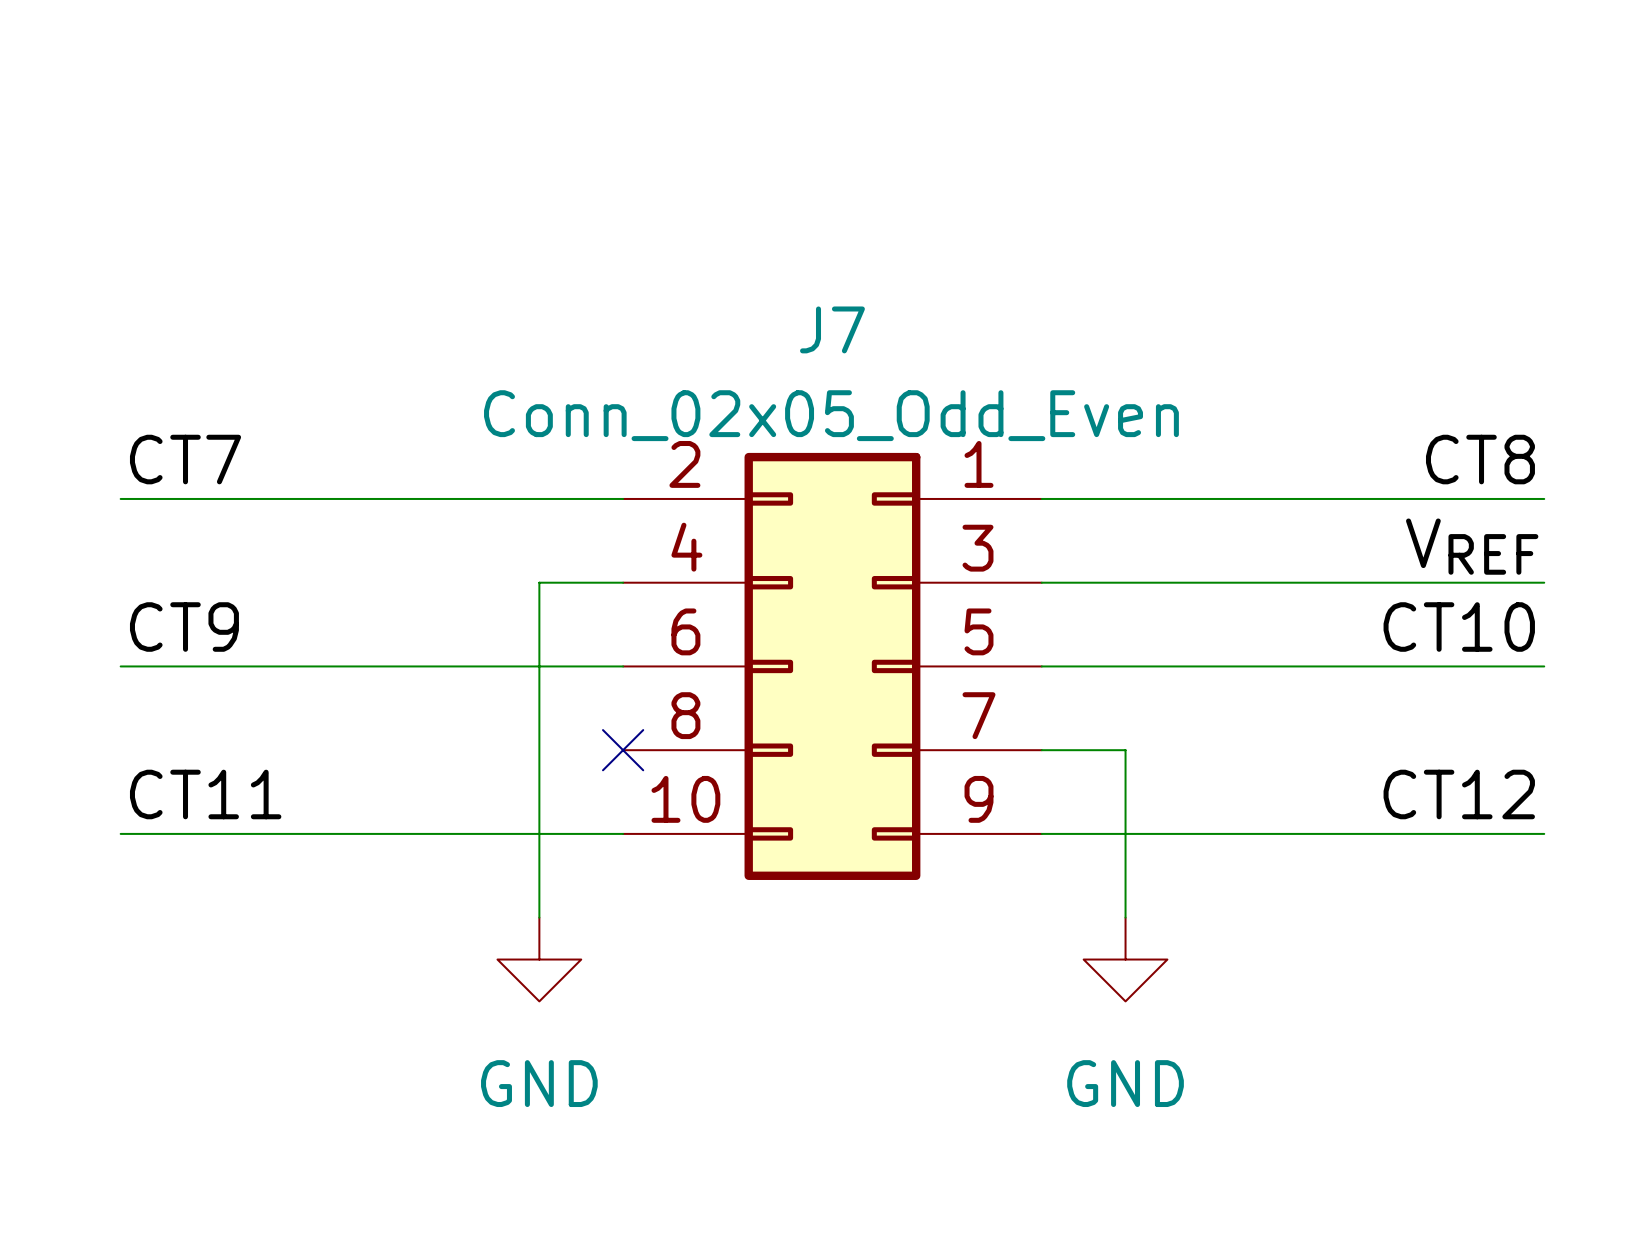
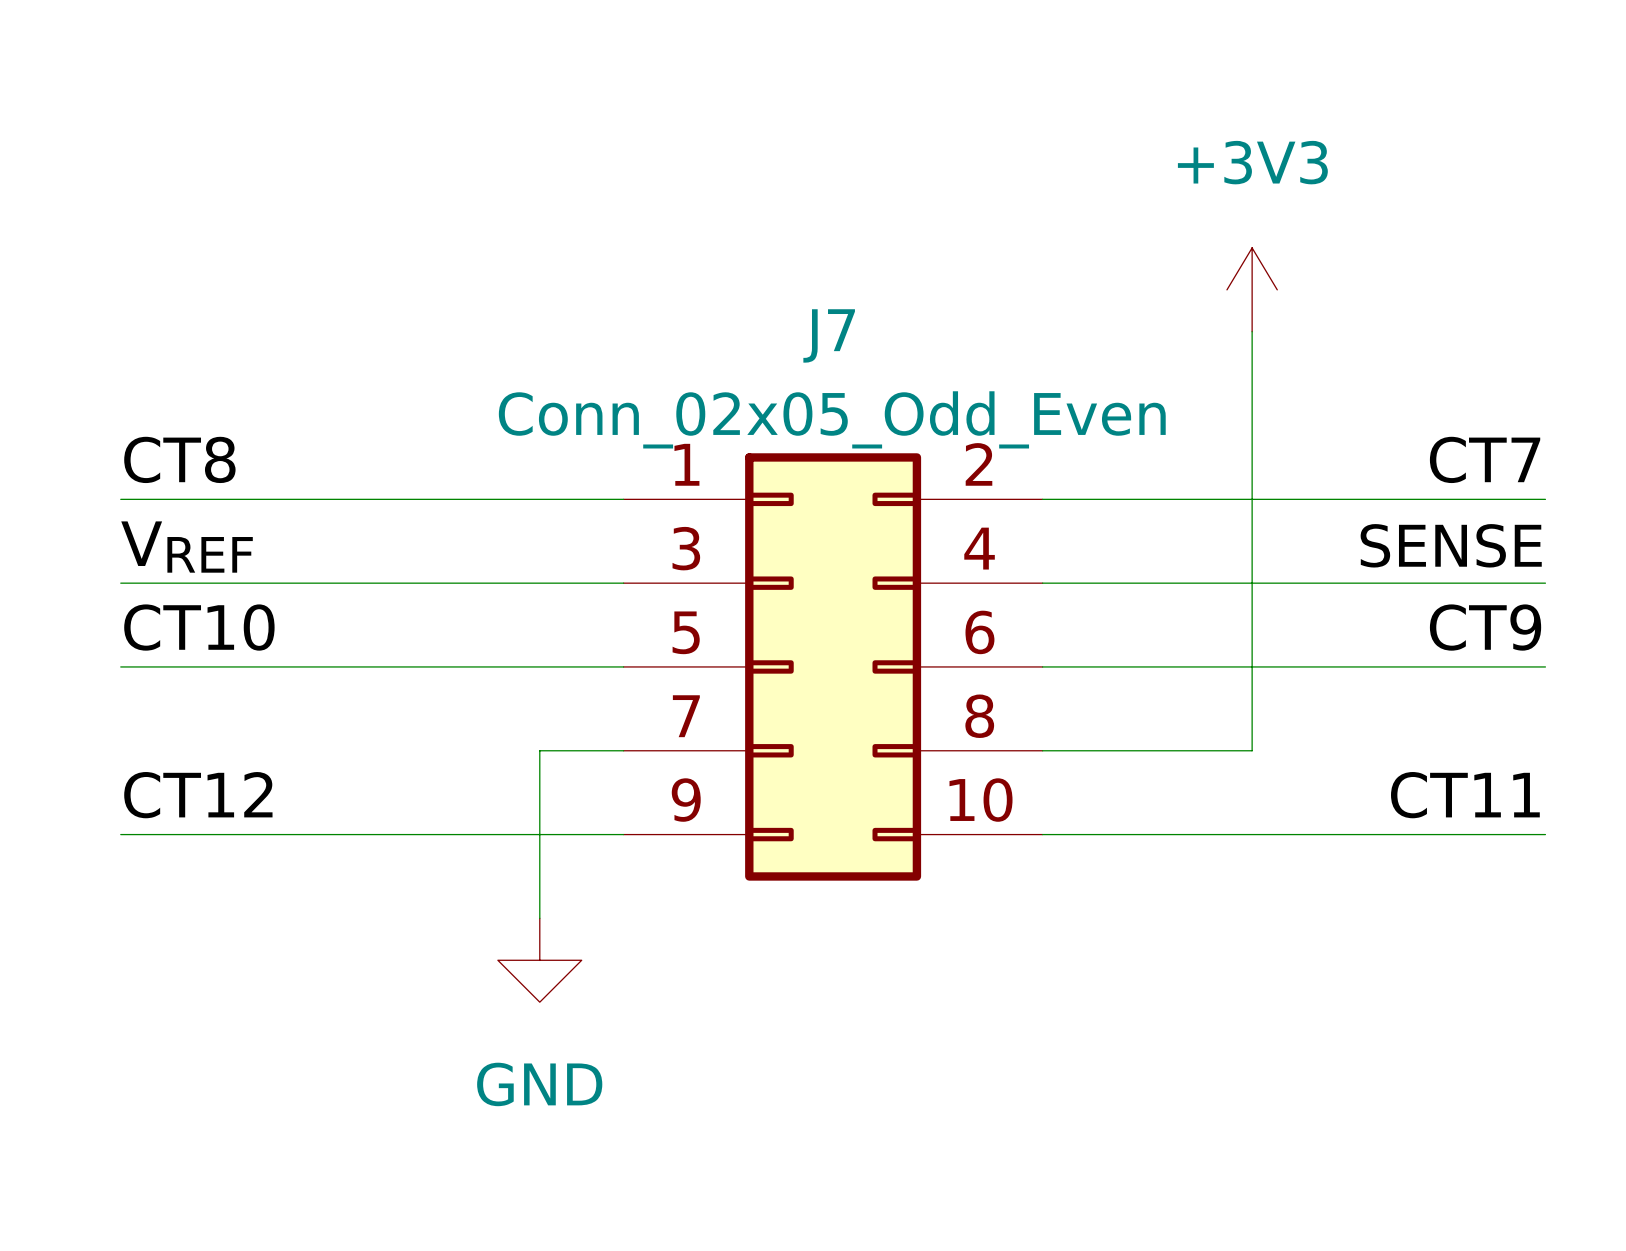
power symbol: none -> +3V3 (1252, 289)
label: CT7 (185, 459) -> CT8 (179, 459)
label: CT8 (1480, 459) -> CT7 (1485, 459)
label: none -> VREF (187, 547)
label: VREF (1472, 546) -> SENSE (1451, 545)
wire: none -> (120, 583) (539, 583)
wire: (539, 582) (539, 750) -> (623, 750) (539, 750)
label: CT9 (184, 627) -> CT10 (199, 627)
label: CT10 (1459, 627) -> CT9 (1485, 627)
J7 flip: as is (832, 666) -> left-right (833, 666)
no-connect mark: (623, 750) -> none
wire: (1125, 750) (1125, 917) -> (1126, 750) (1252, 750) (1252, 331)
label: CT11 (205, 794) -> CT12 (198, 795)
label: CT12 (1459, 794) -> CT11 (1465, 795)
power symbol: GND (1125, 959) -> none

